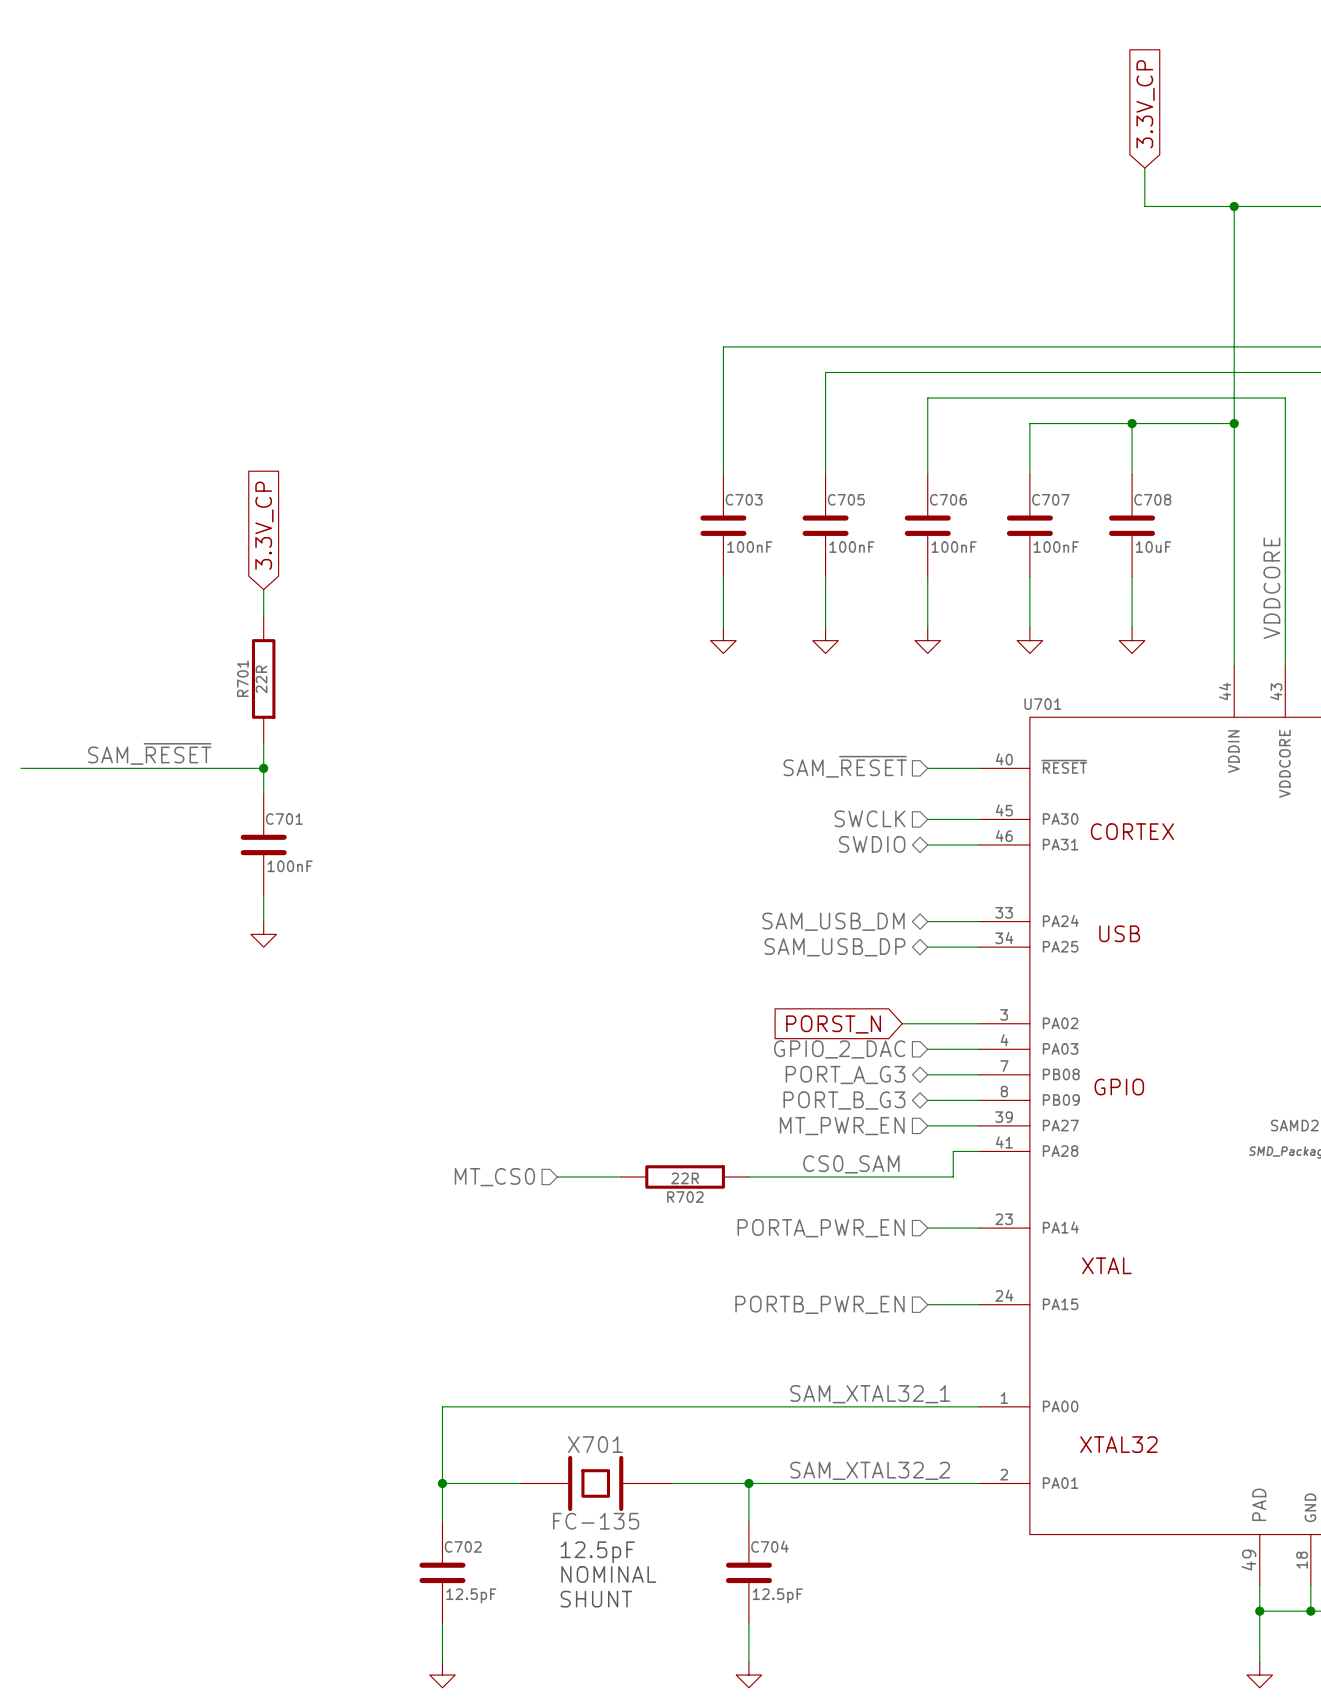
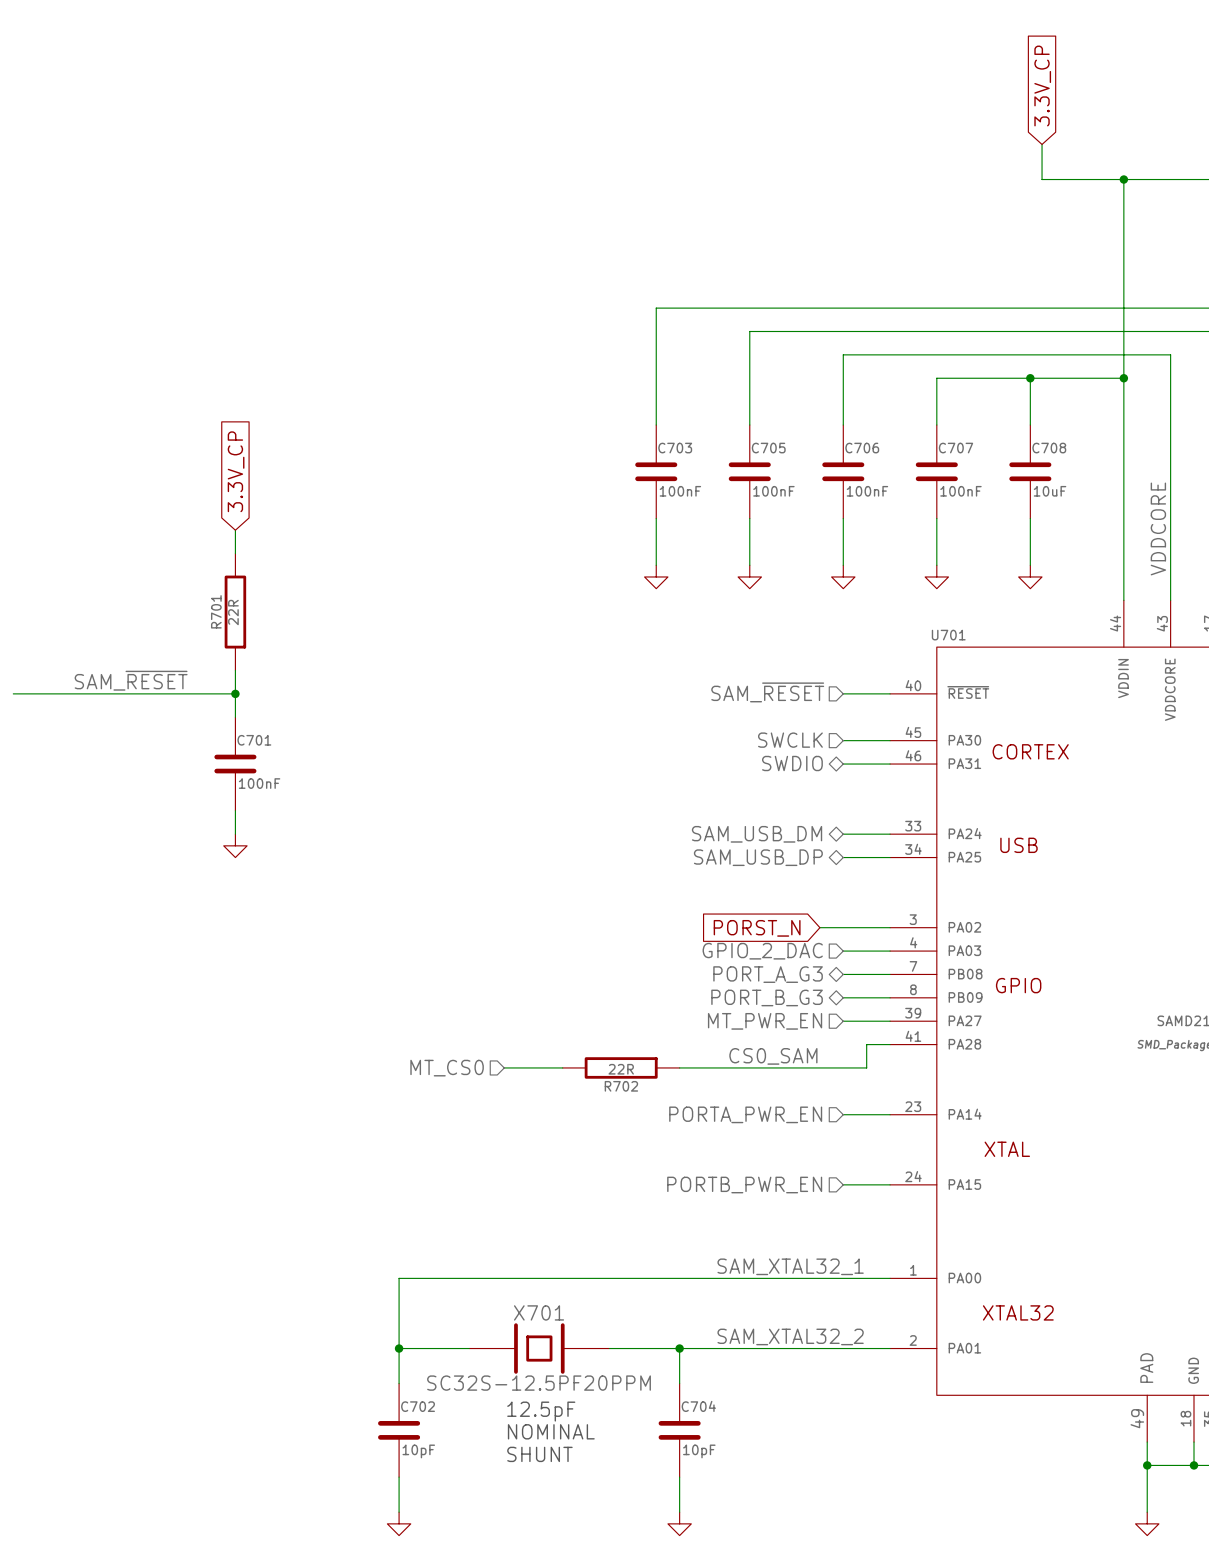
X701 value: FC-135 (596, 1521) -> SC32S-12.5PF20PPM (539, 1383)
C702 value: 12.5pF (471, 1595) -> 10pF (418, 1451)
C704 value: 12.5pF (777, 1595) -> 10pF (699, 1451)

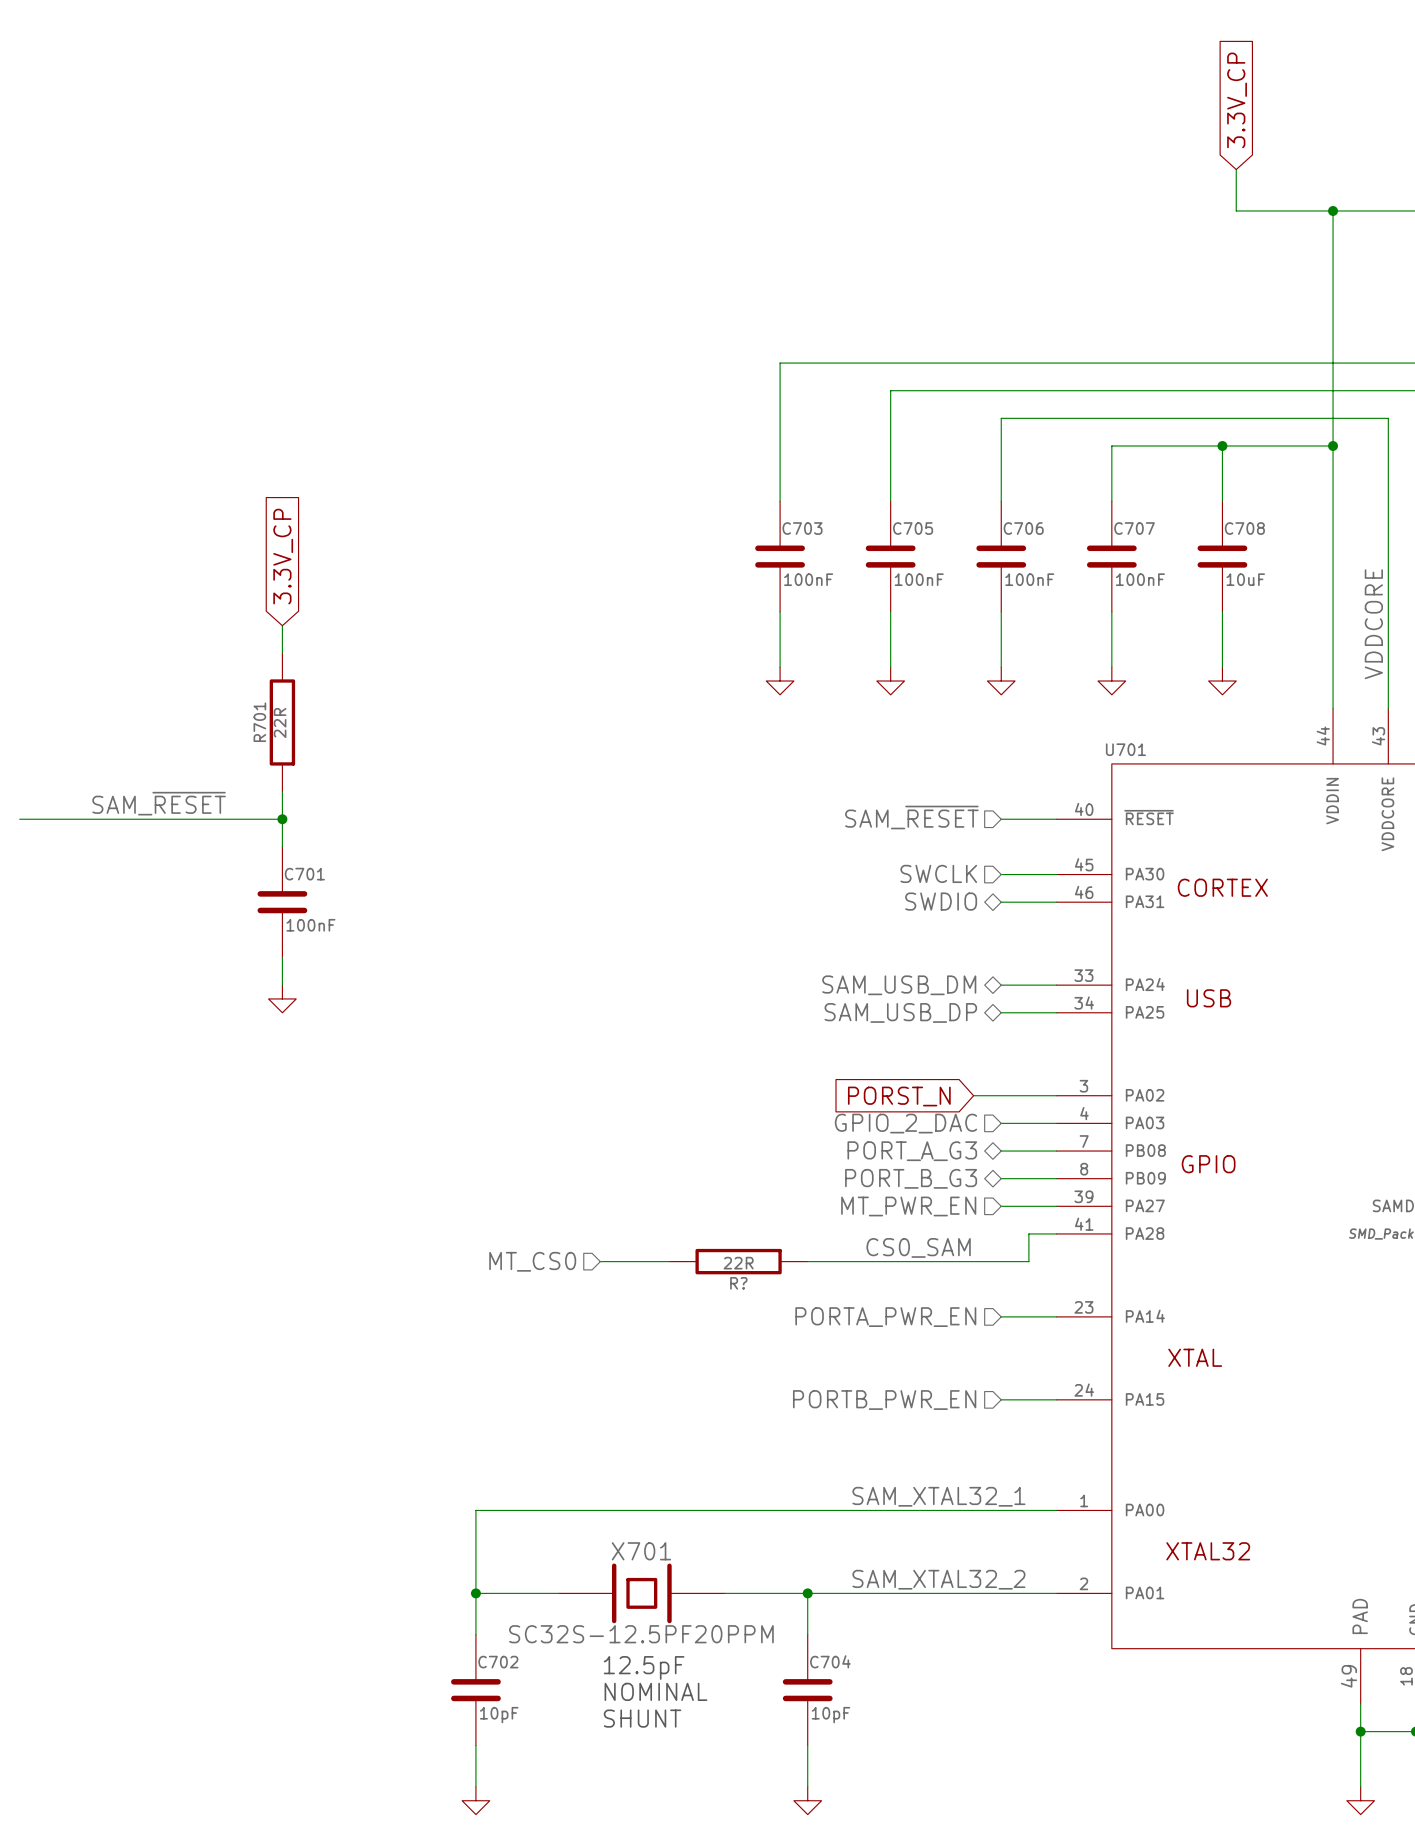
R702 name: R702 (621, 1086) -> R? (738, 1283)

